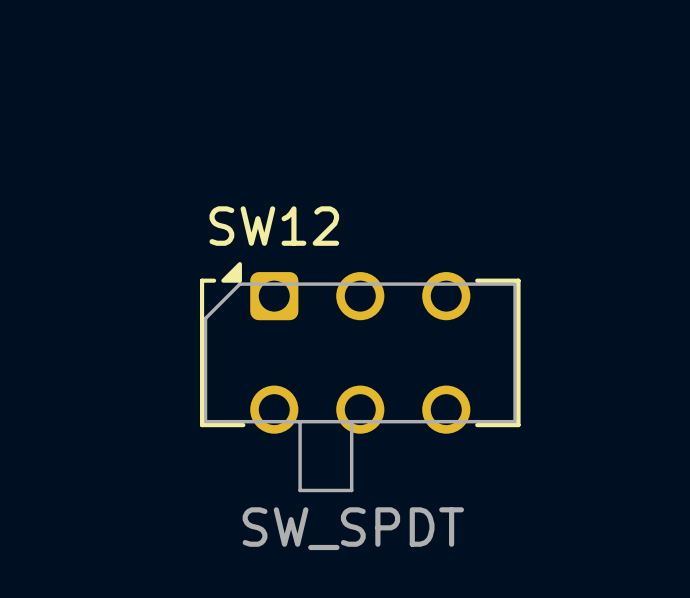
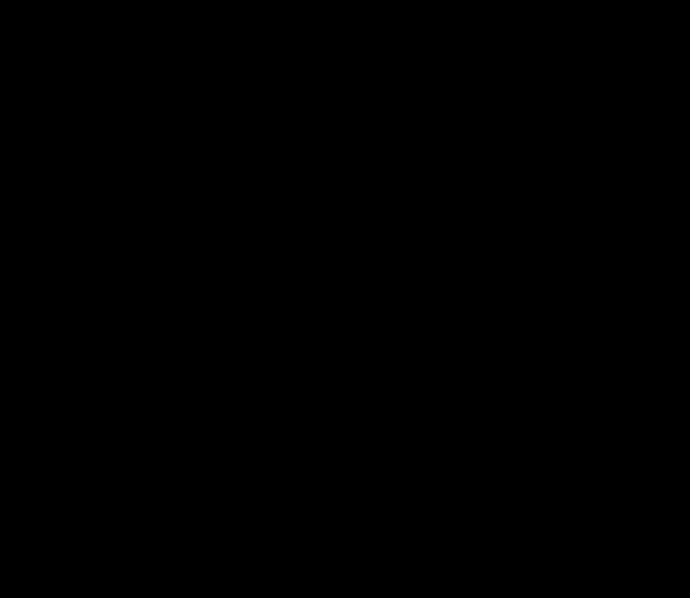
SW12: SW_SPDT (360, 377) -> none

